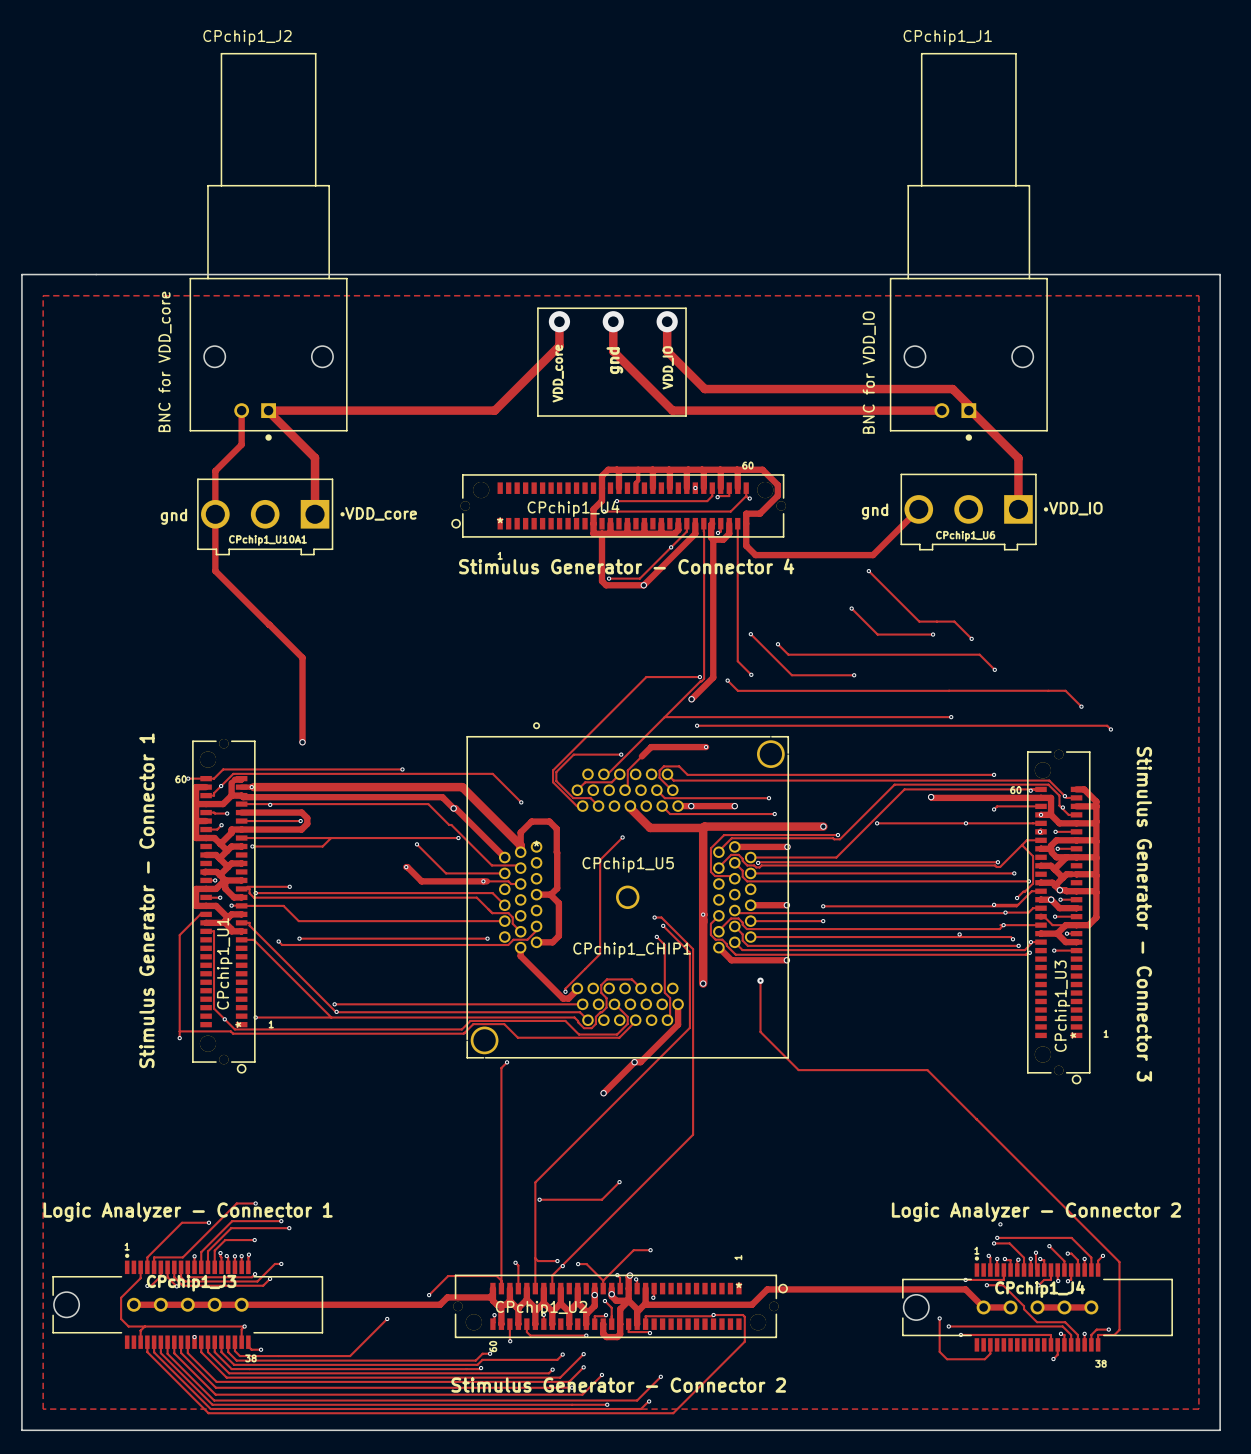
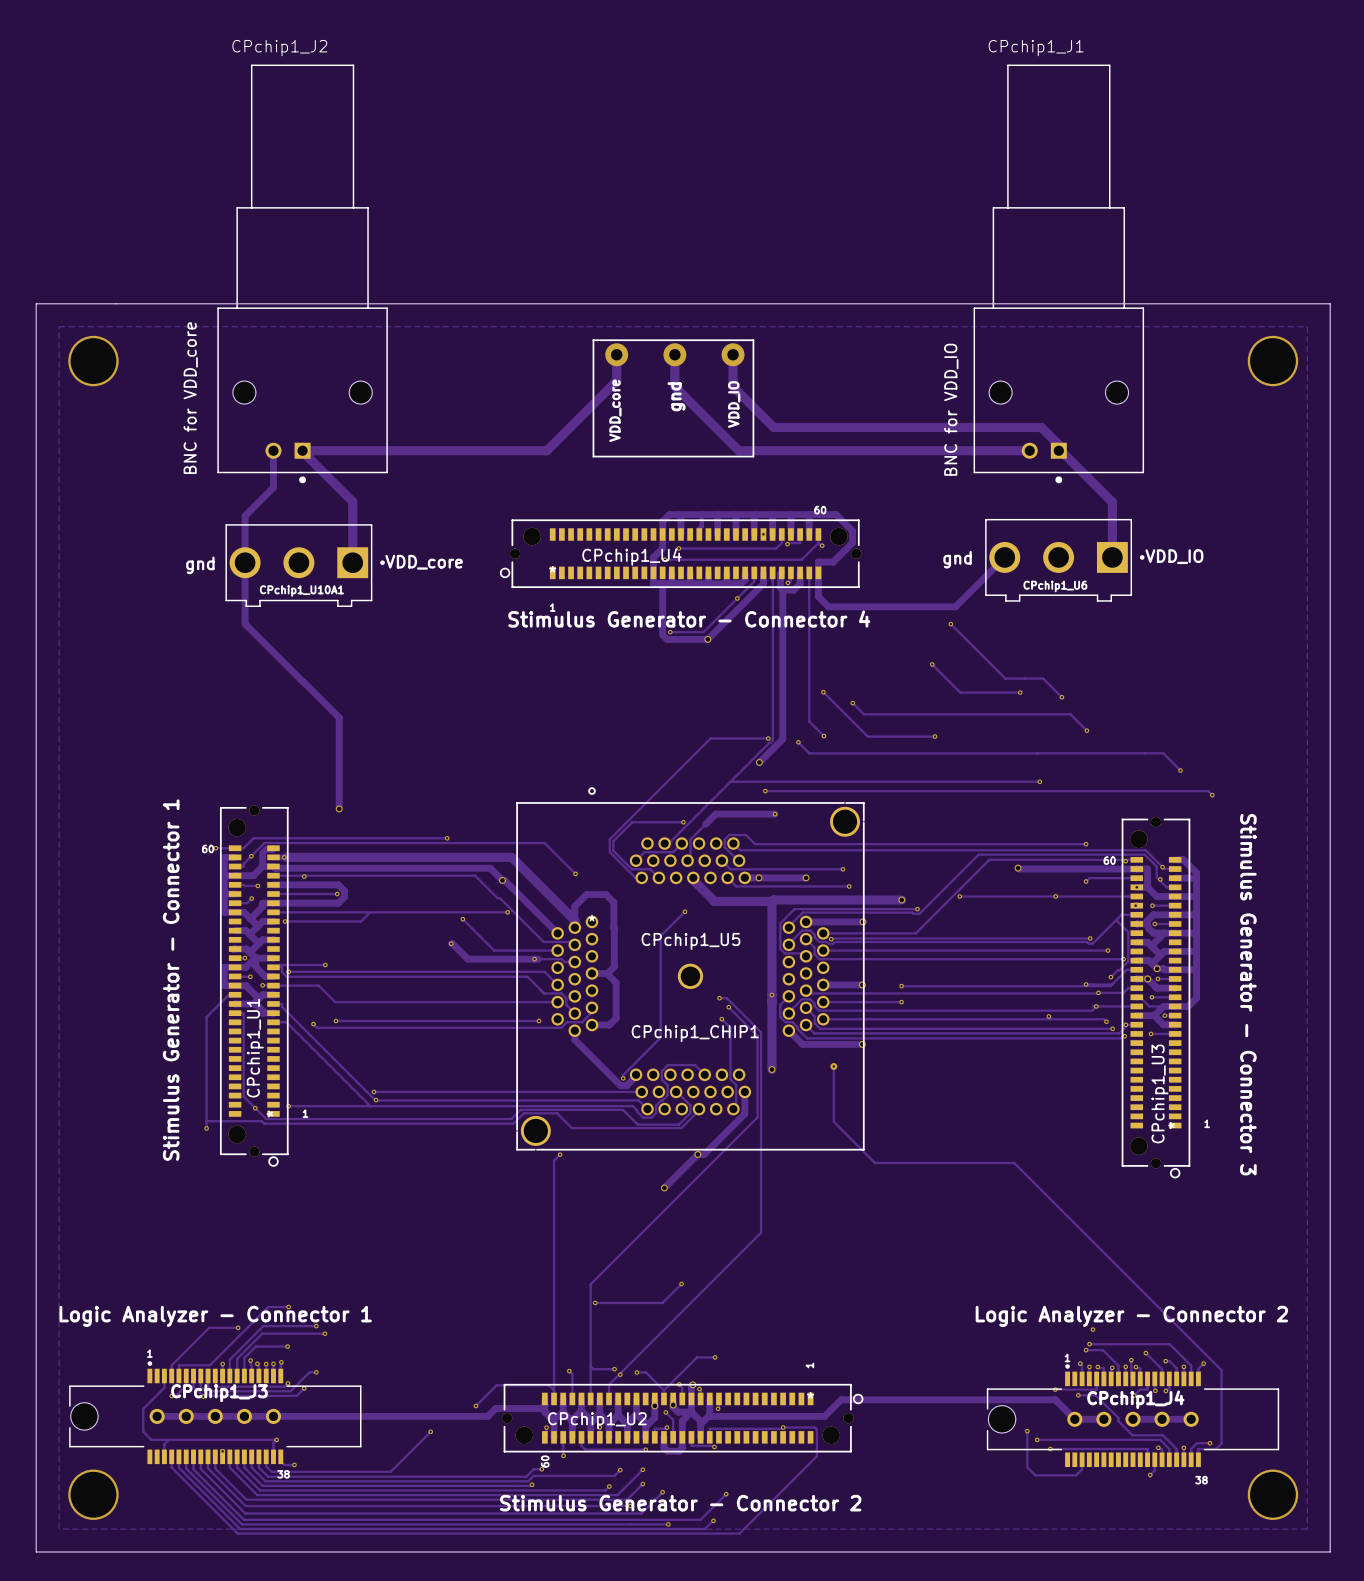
via: none -> (93, 361)
via: none -> (1272, 361)
via: none -> (93, 1494)
via: none -> (1272, 1494)

